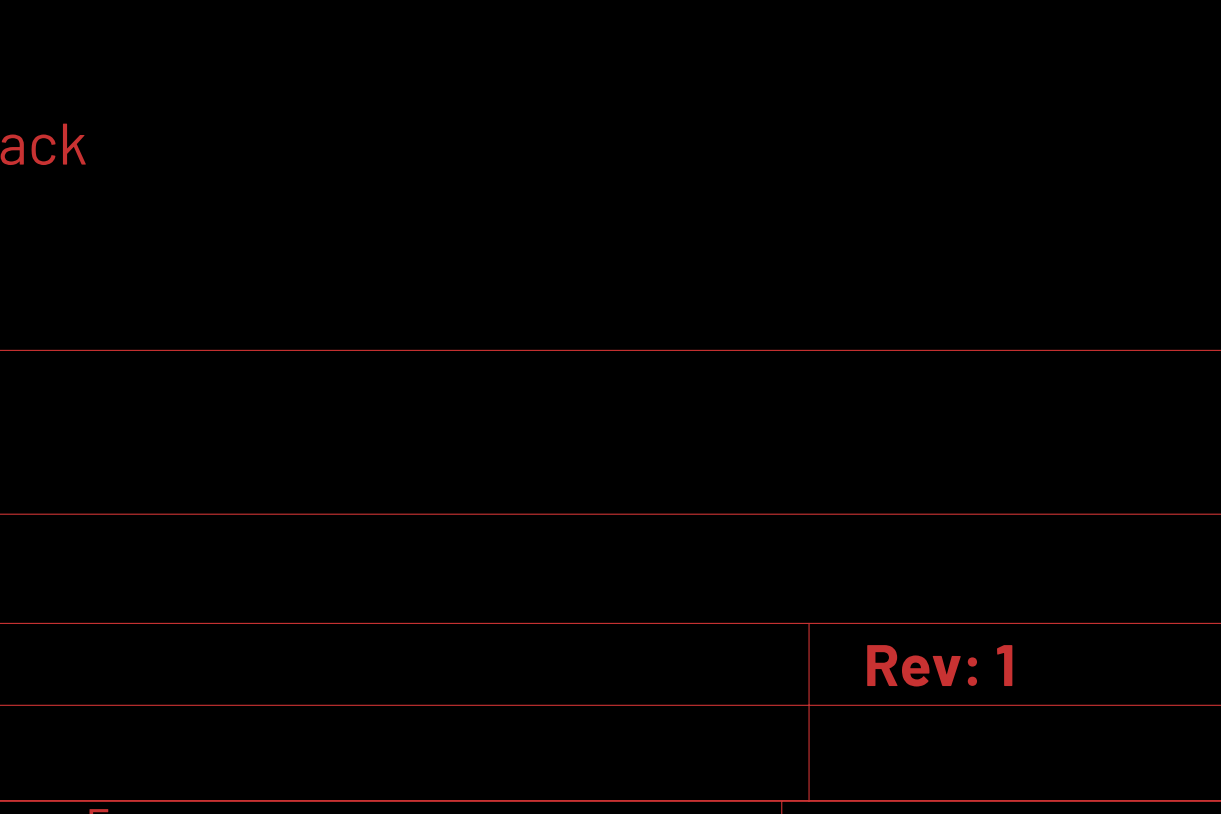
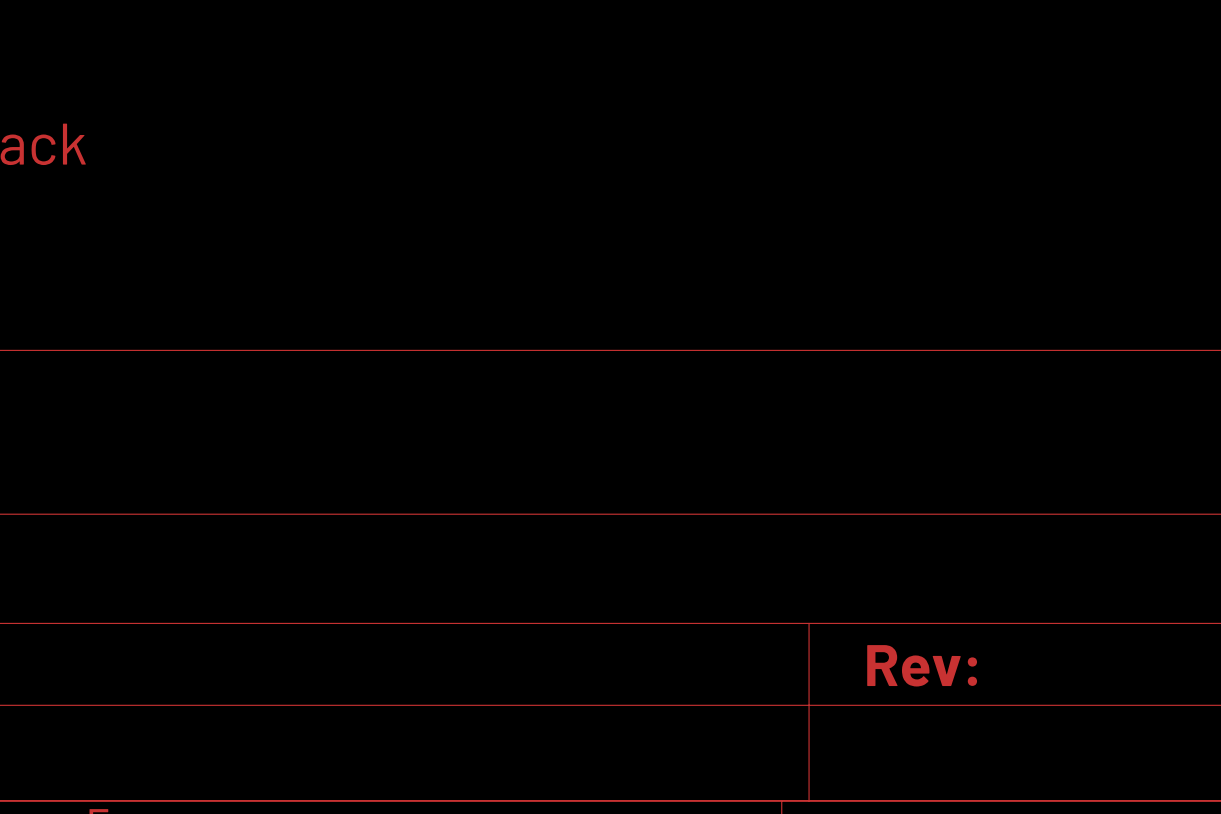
title block: Rev: 1 (939, 665) -> Rev: (922, 665)

